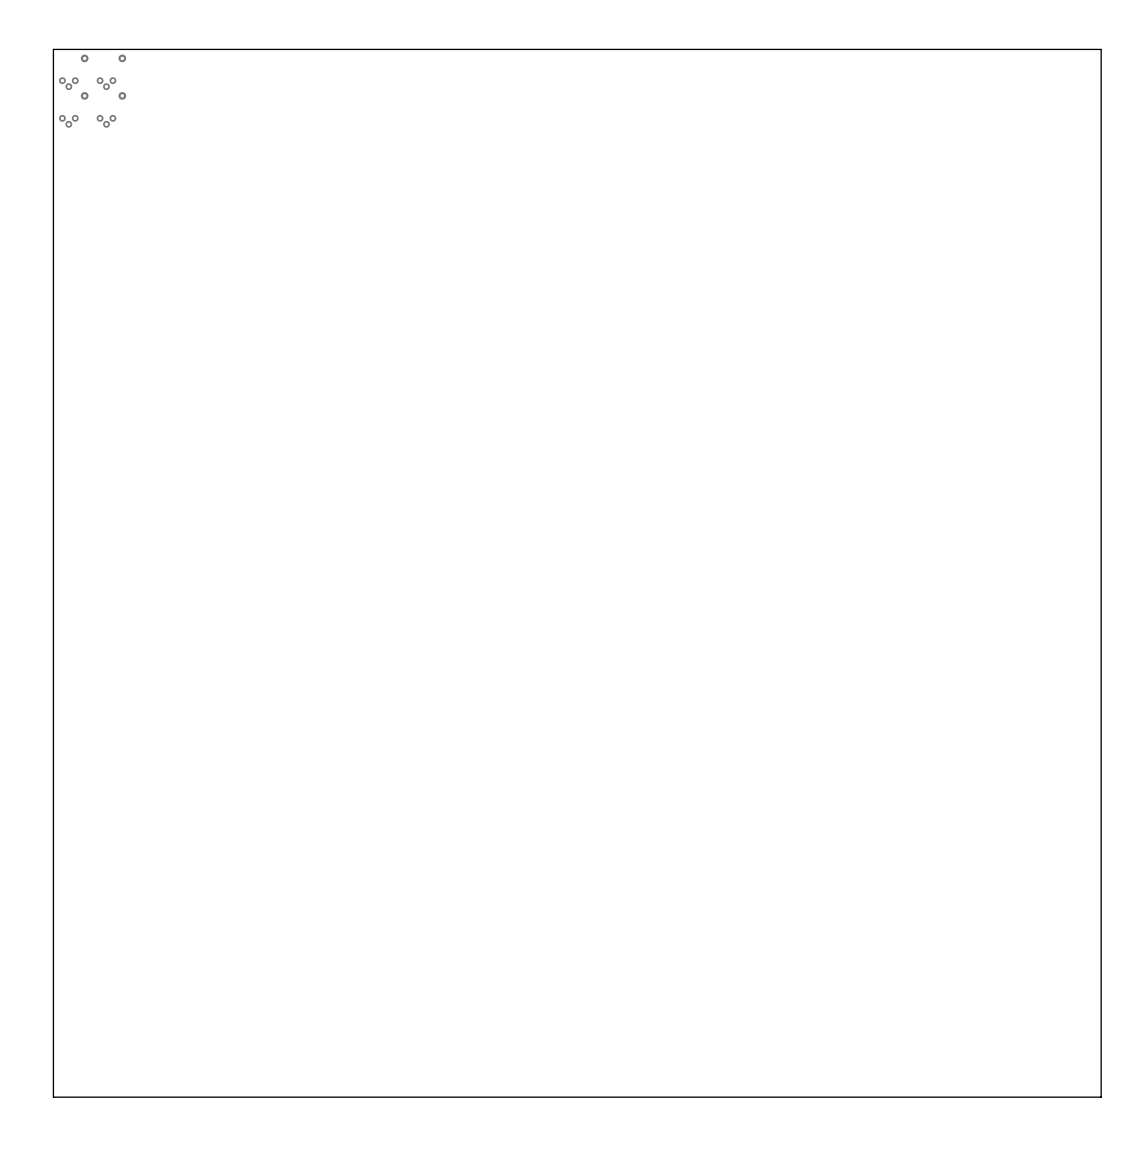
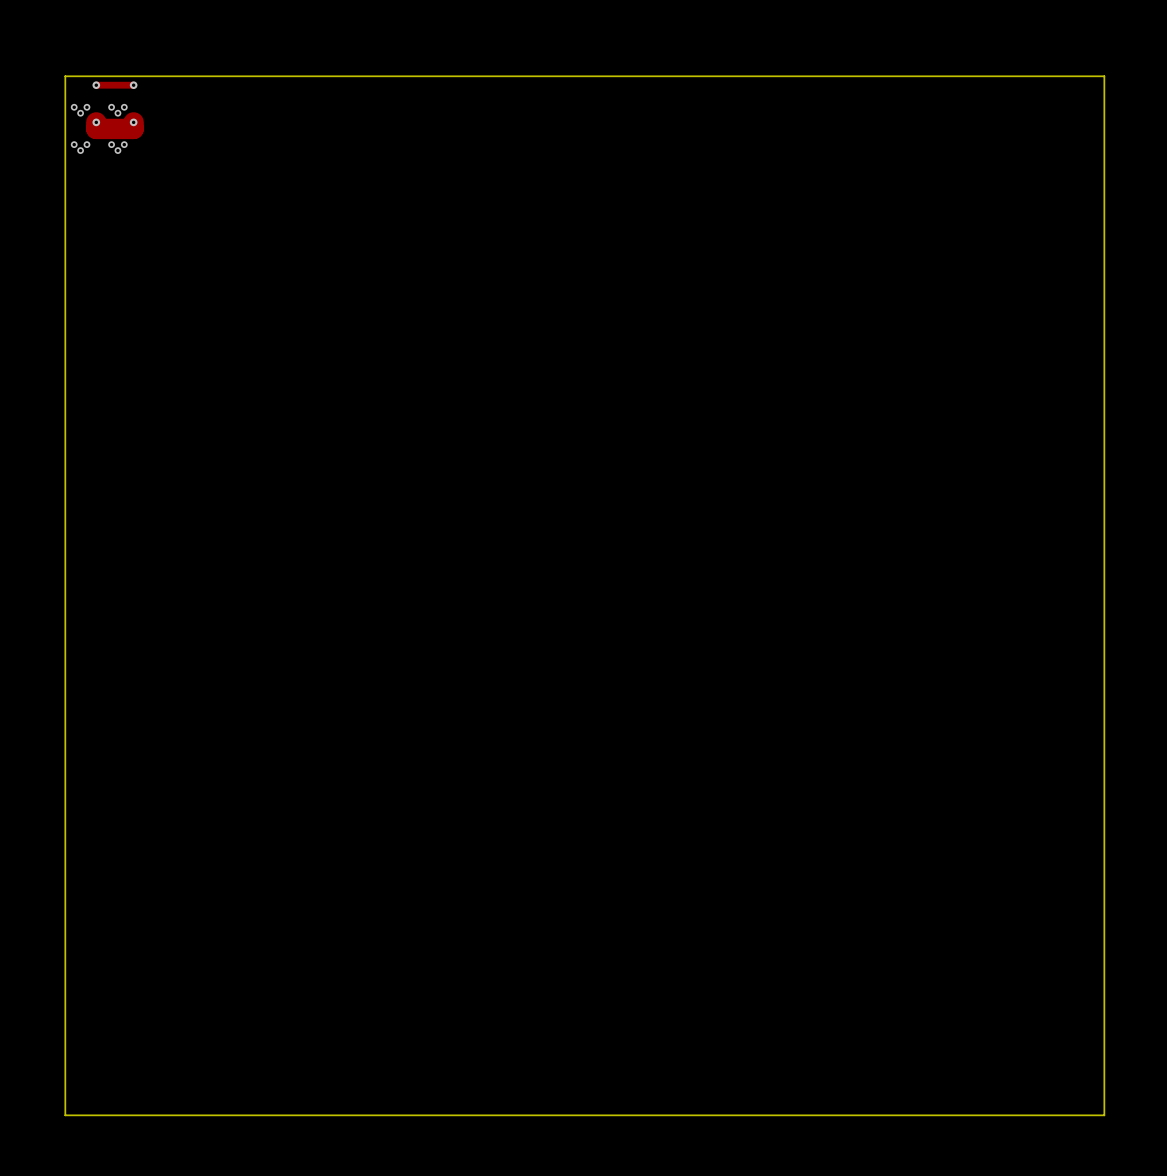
track: none -> (96, 85) (133, 85)
track: none -> (96, 122) (96, 128) (133, 128) (133, 122)

